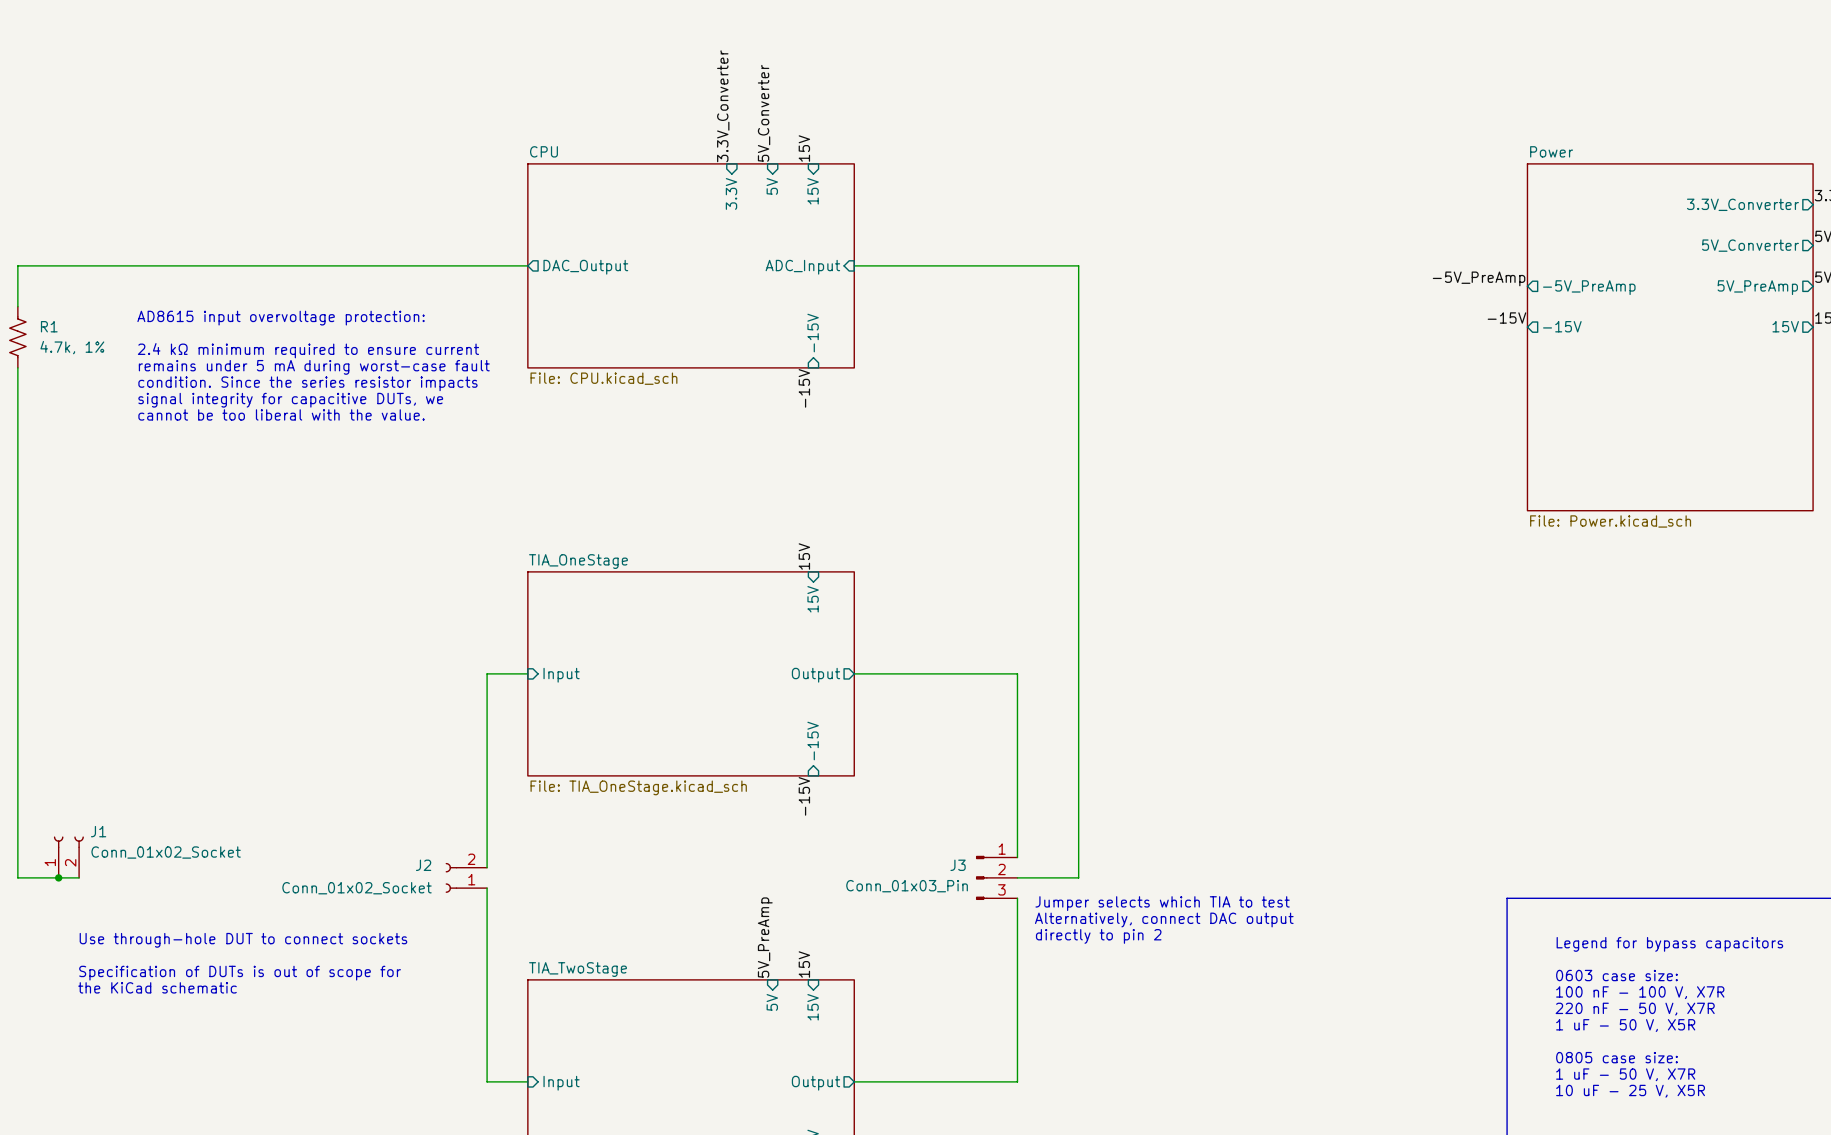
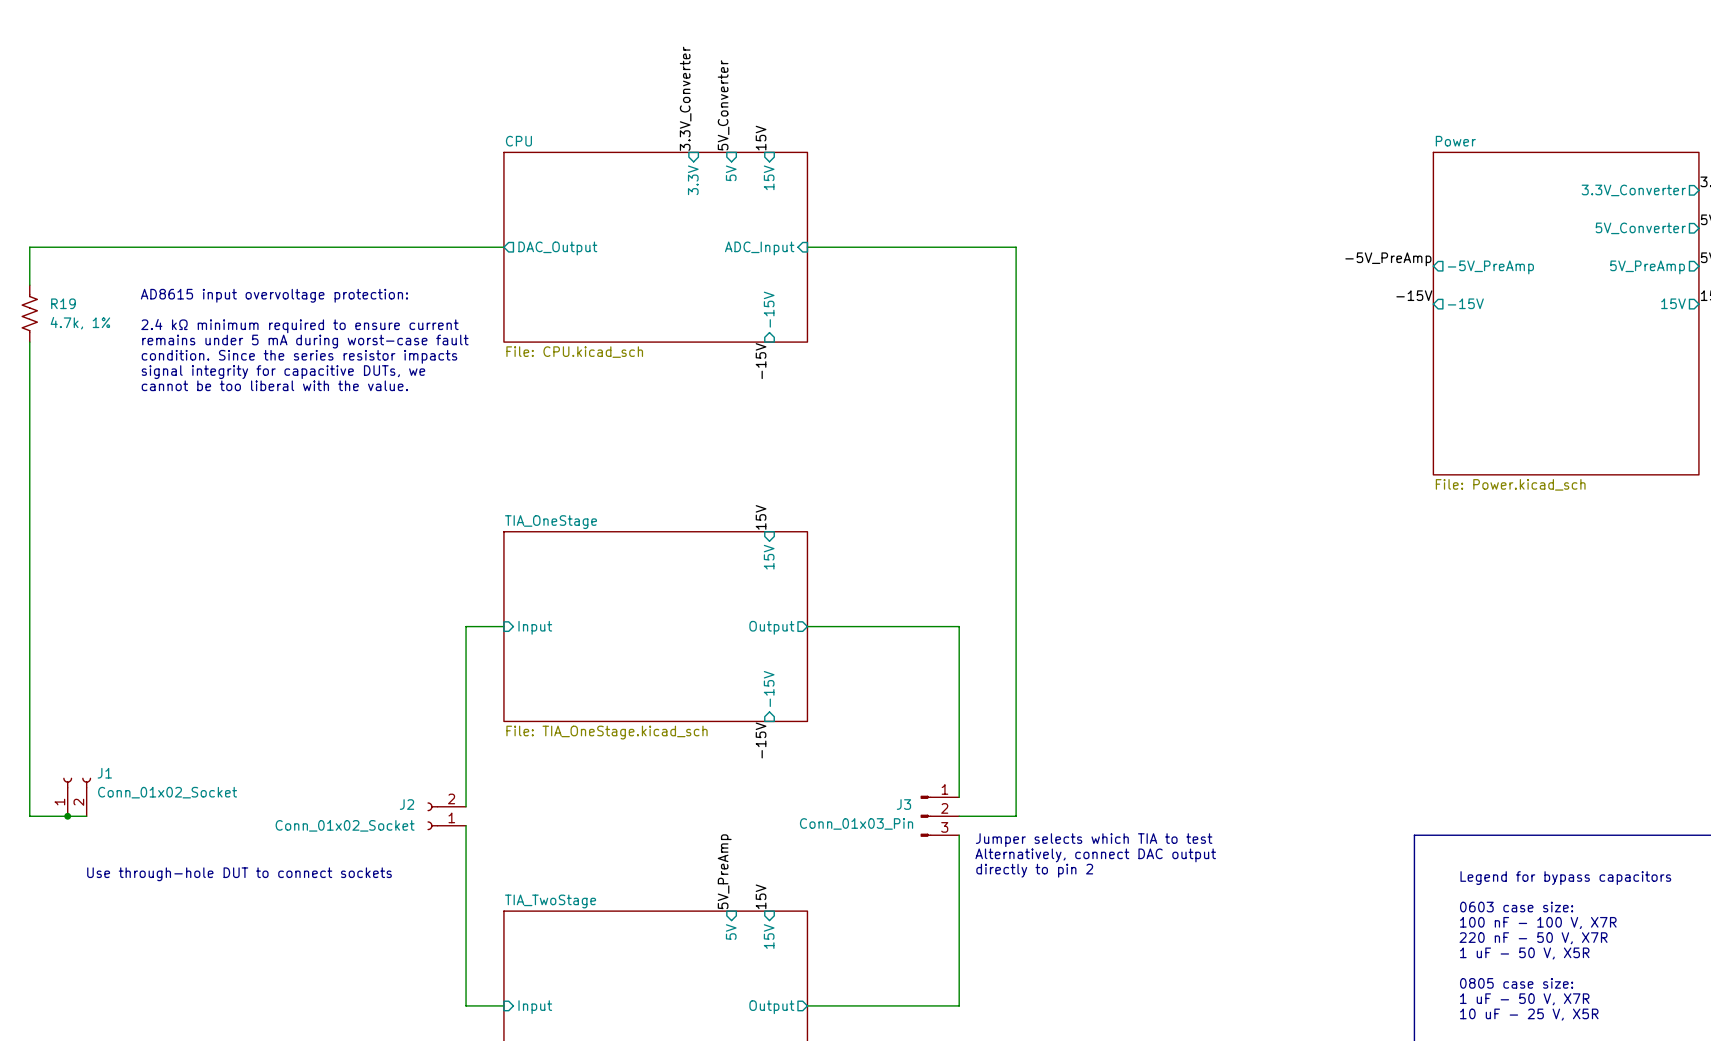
R1 name: R1 (49, 326) -> R19 (63, 303)
text: Specification of DUTs is out of scope for (240, 973) -> none
text: the KiCad schematic (157, 987) -> none

